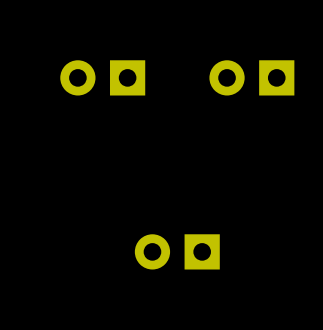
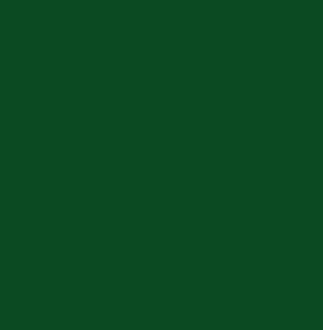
part: (102, 77) -> none
part: (251, 77) -> none
part: (177, 251) -> none

